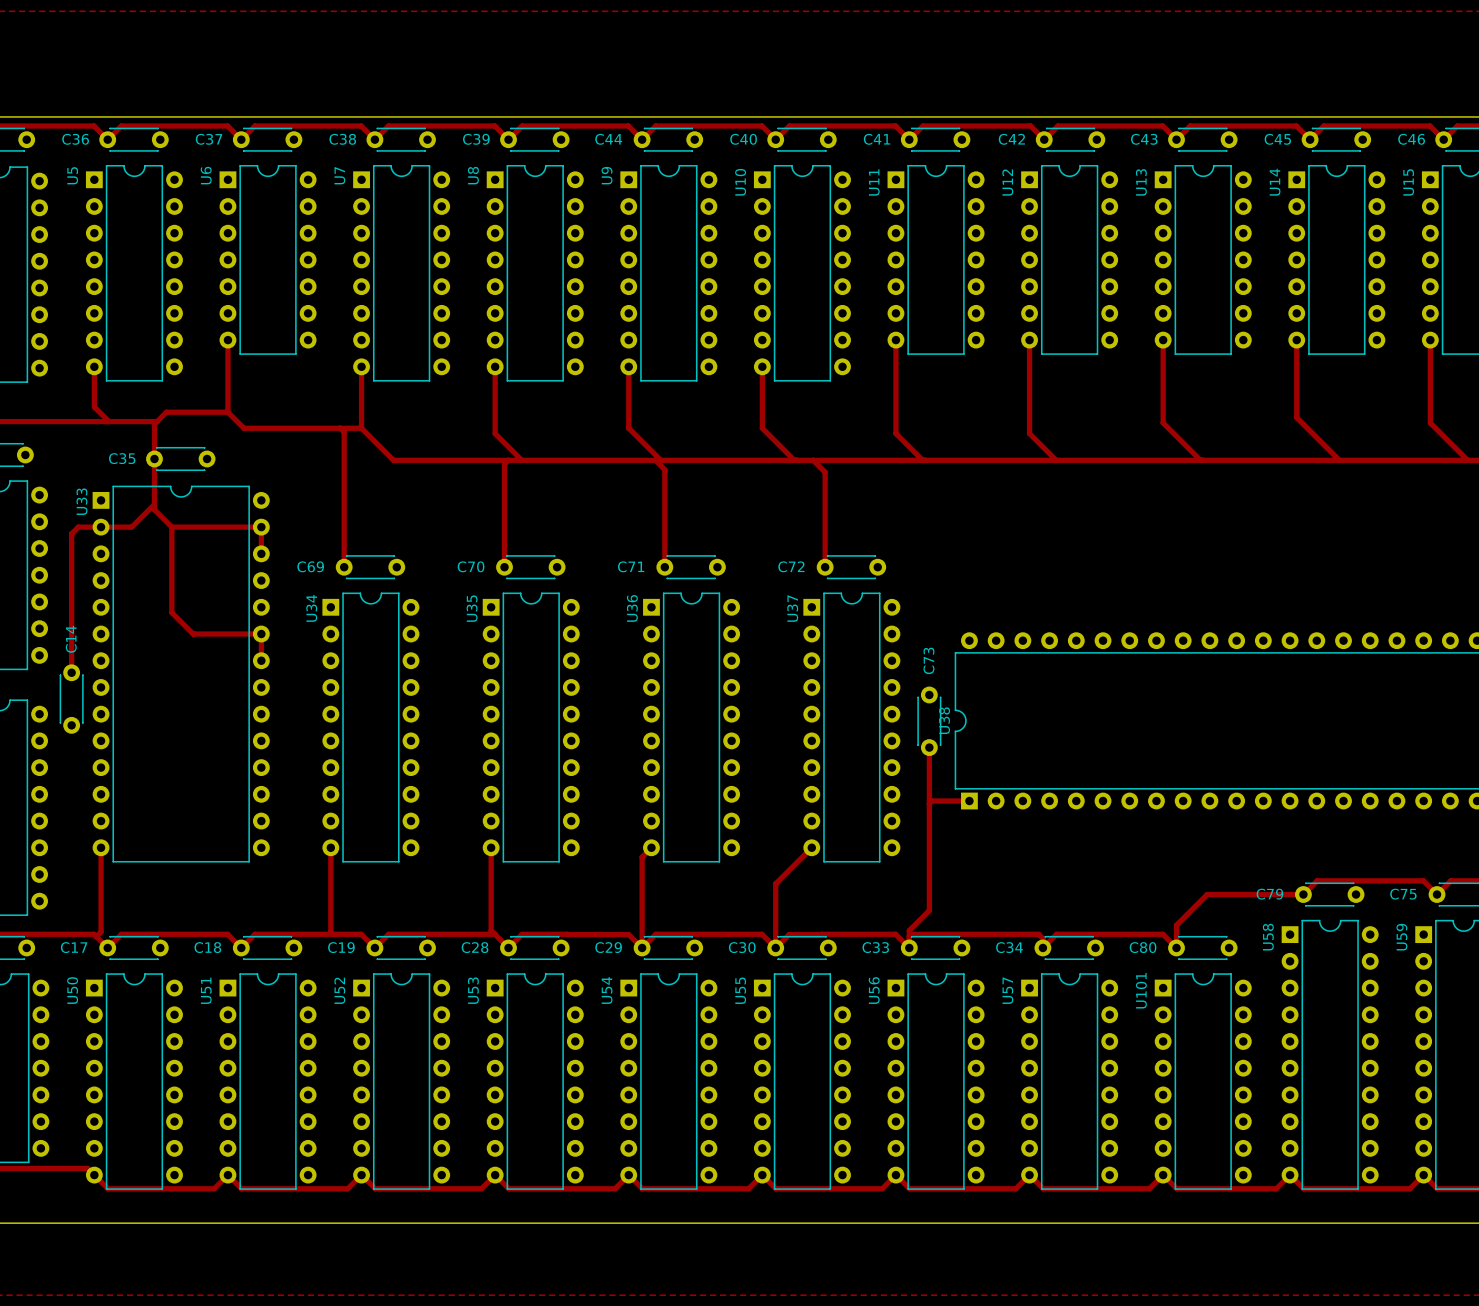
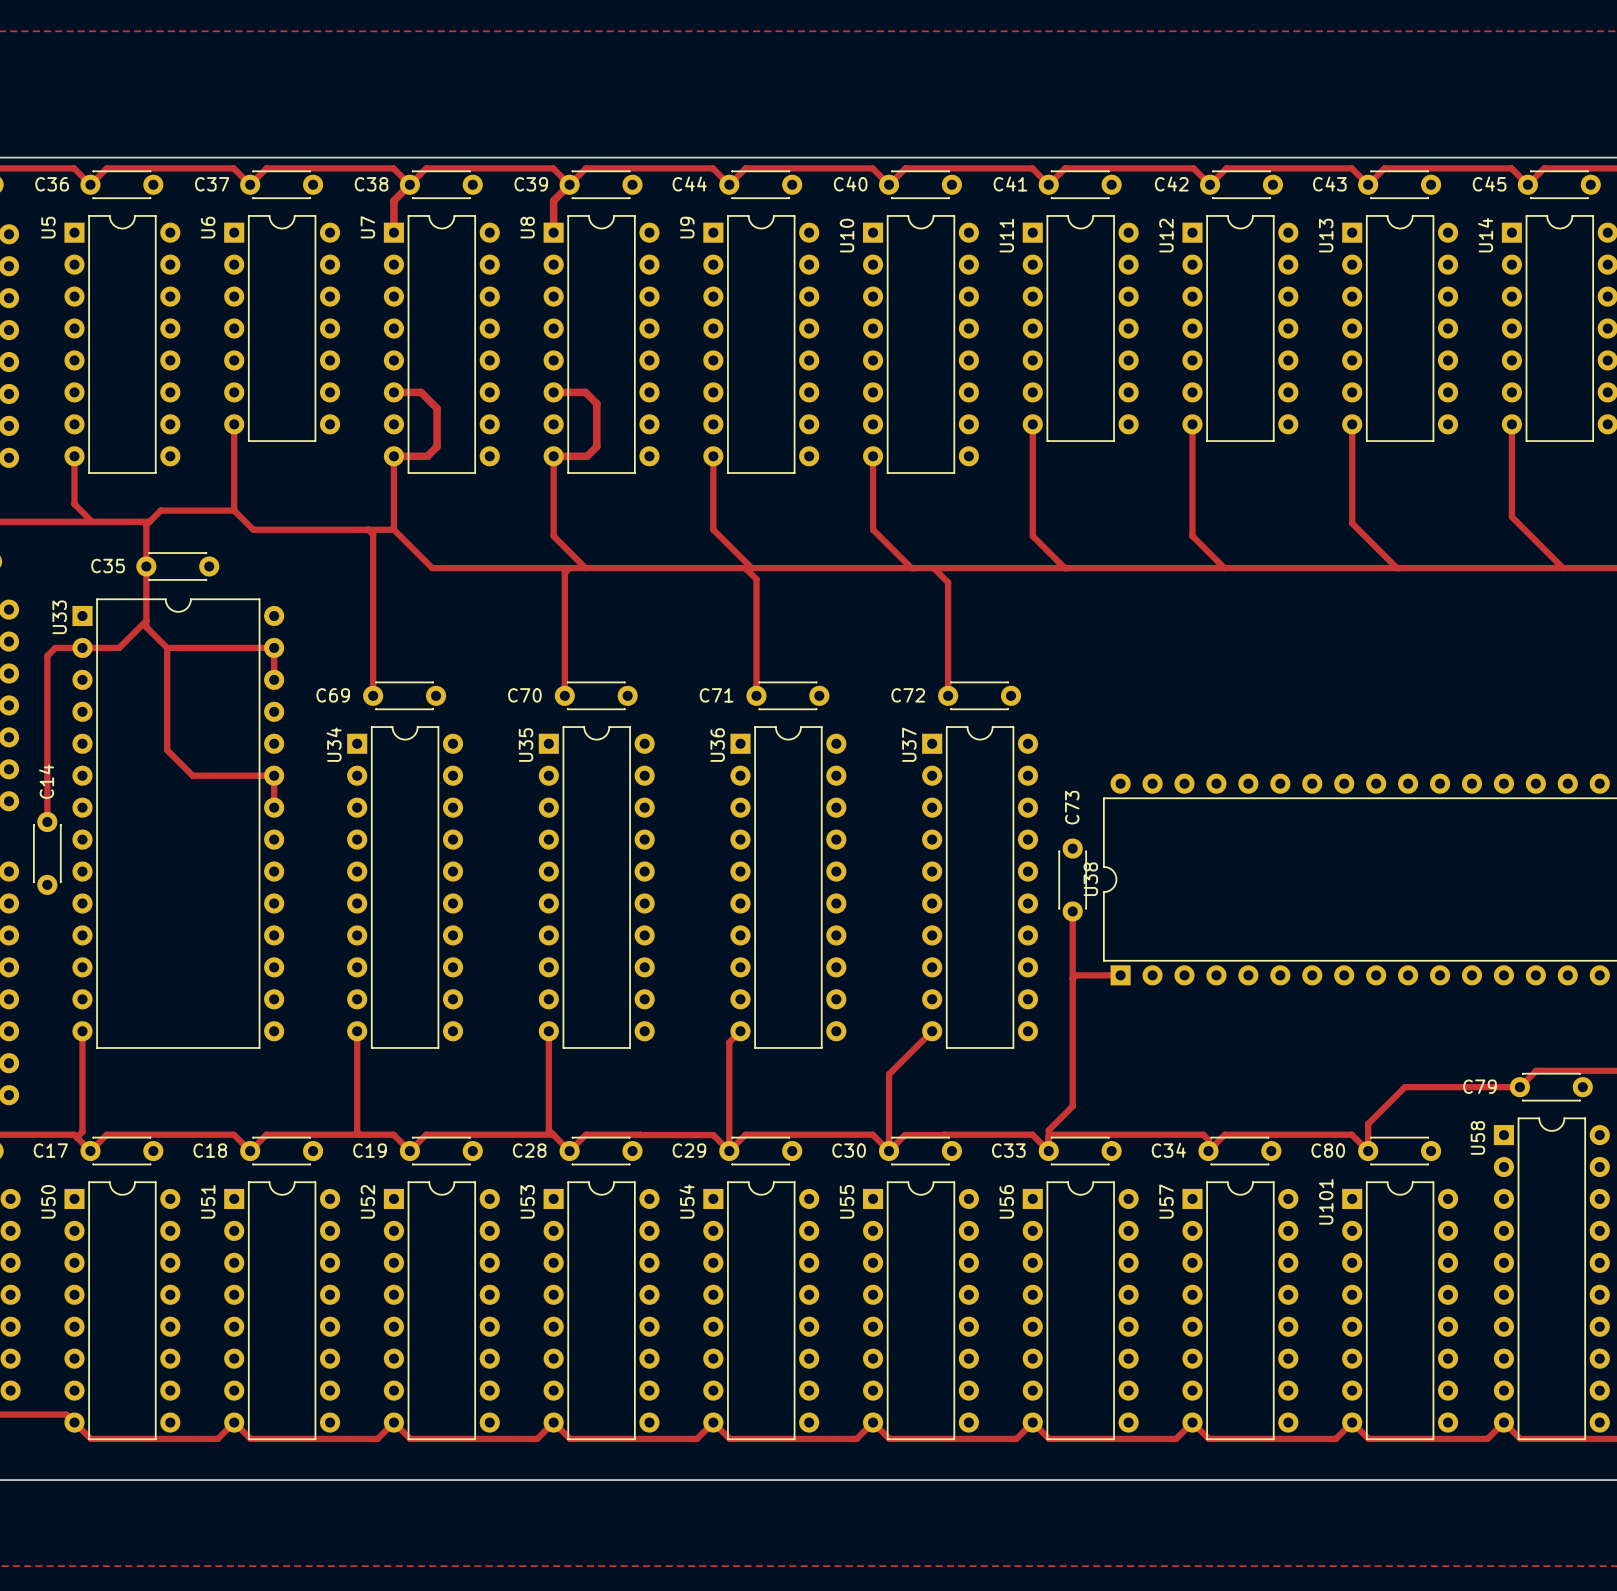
track: none -> (409, 184) (393, 200) (393, 232)
track: none -> (569, 184) (553, 200) (553, 232)
track: none -> (393, 392) (421, 392) (437, 408) (437, 446) (427, 456) (393, 456)
track: none -> (553, 392) (585, 392) (596, 403) (596, 446) (587, 456) (553, 456)

